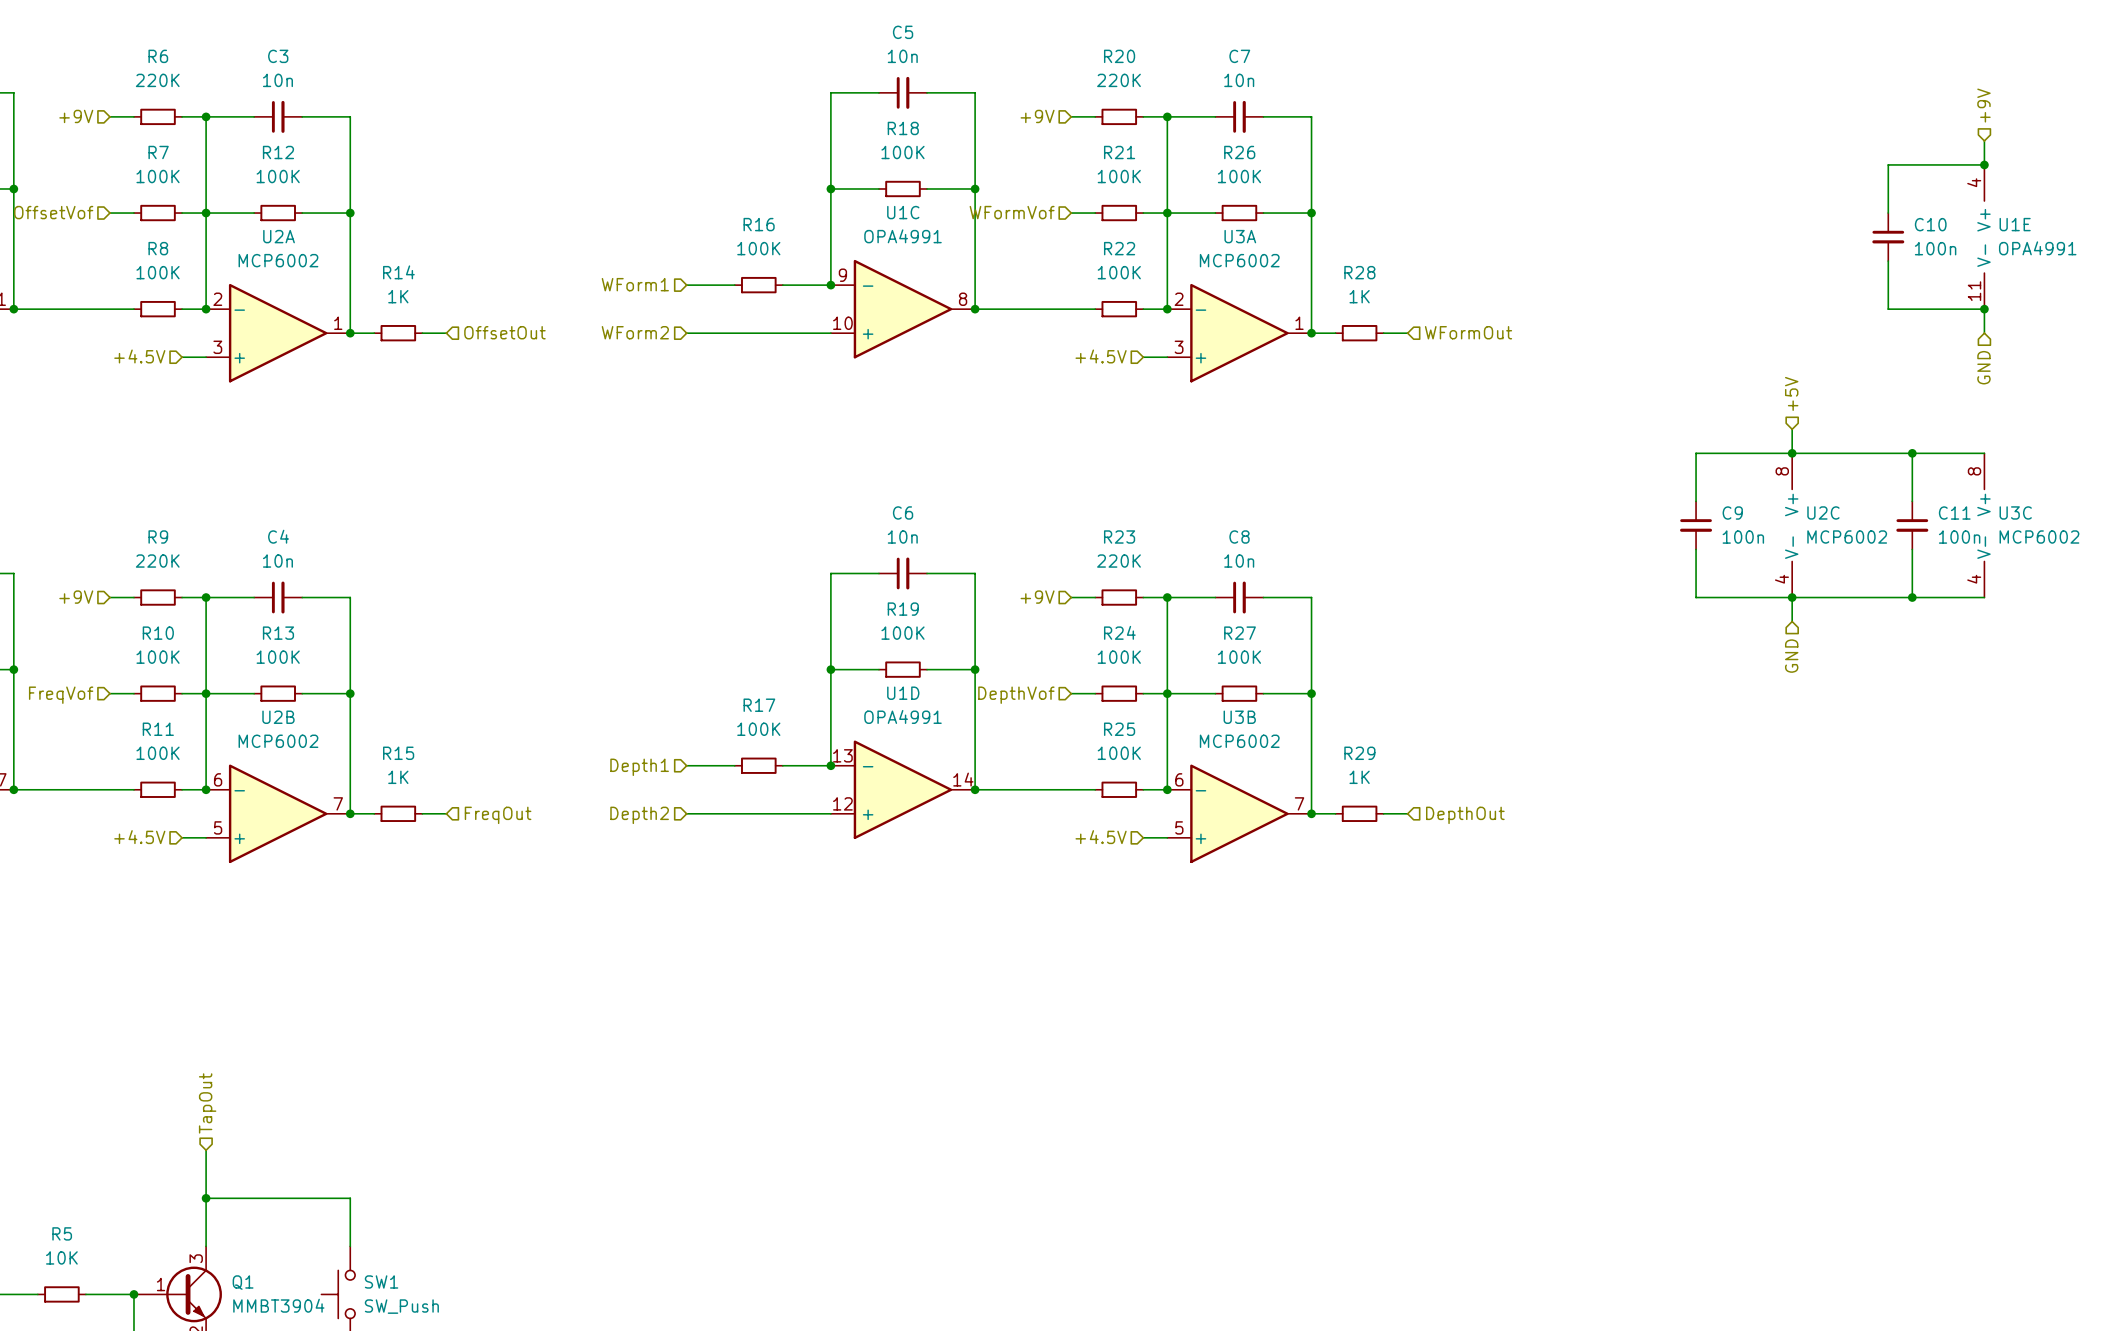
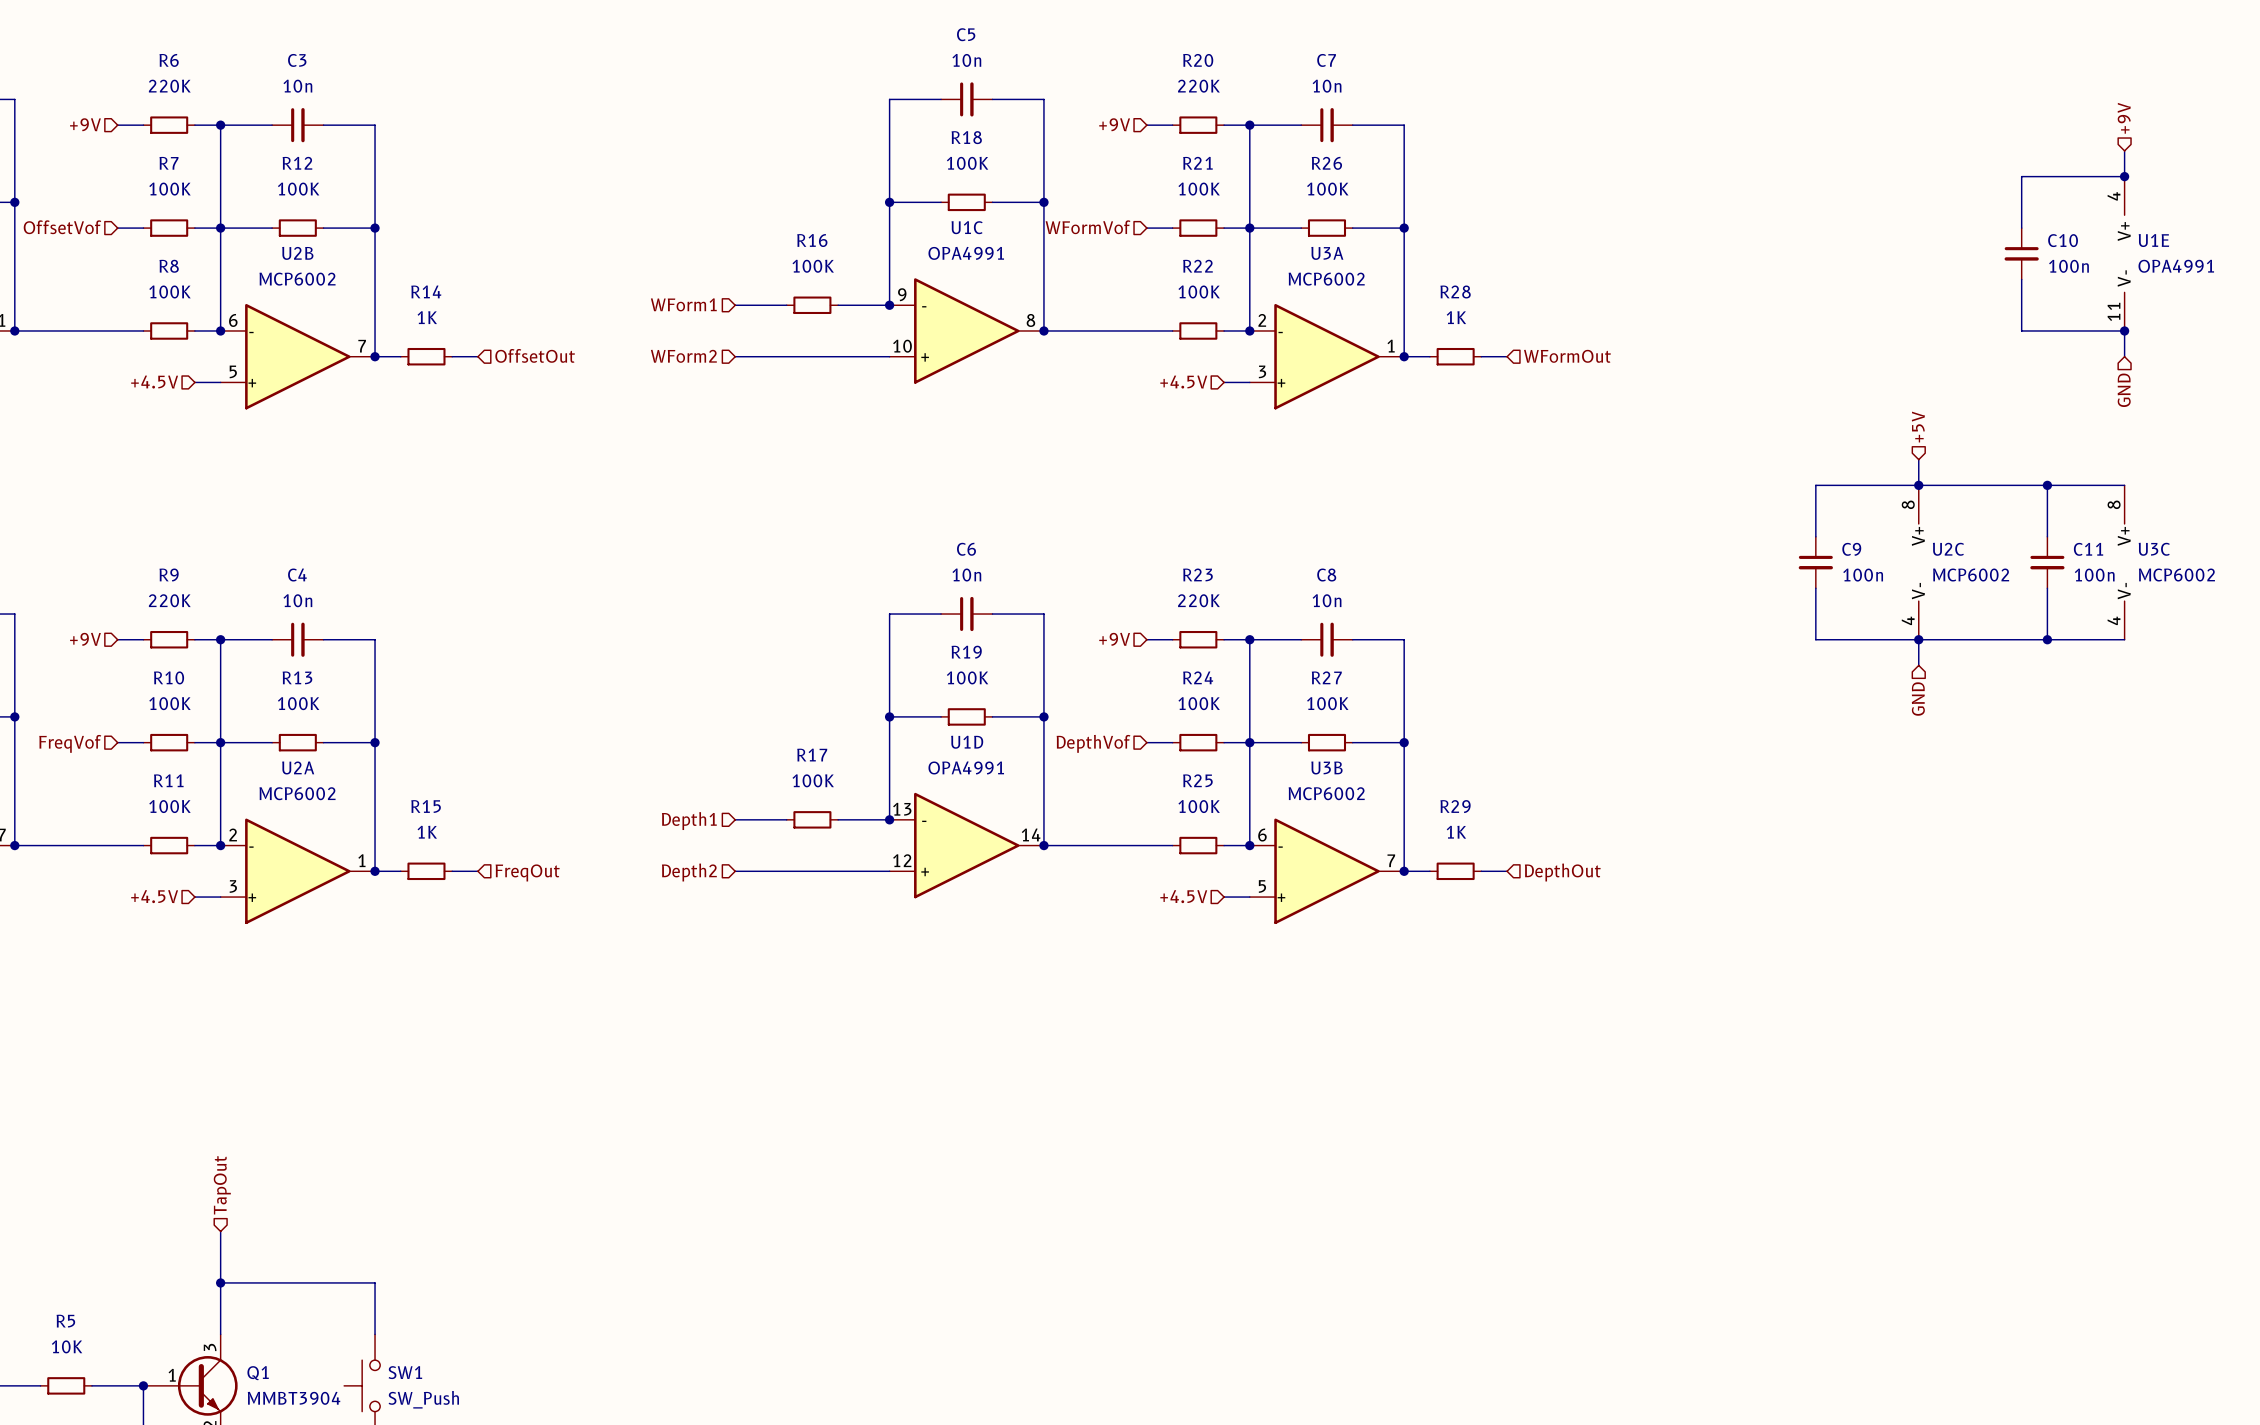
U2A position: (278, 333) -> (297, 871)
U2B position: (278, 813) -> (297, 356)

